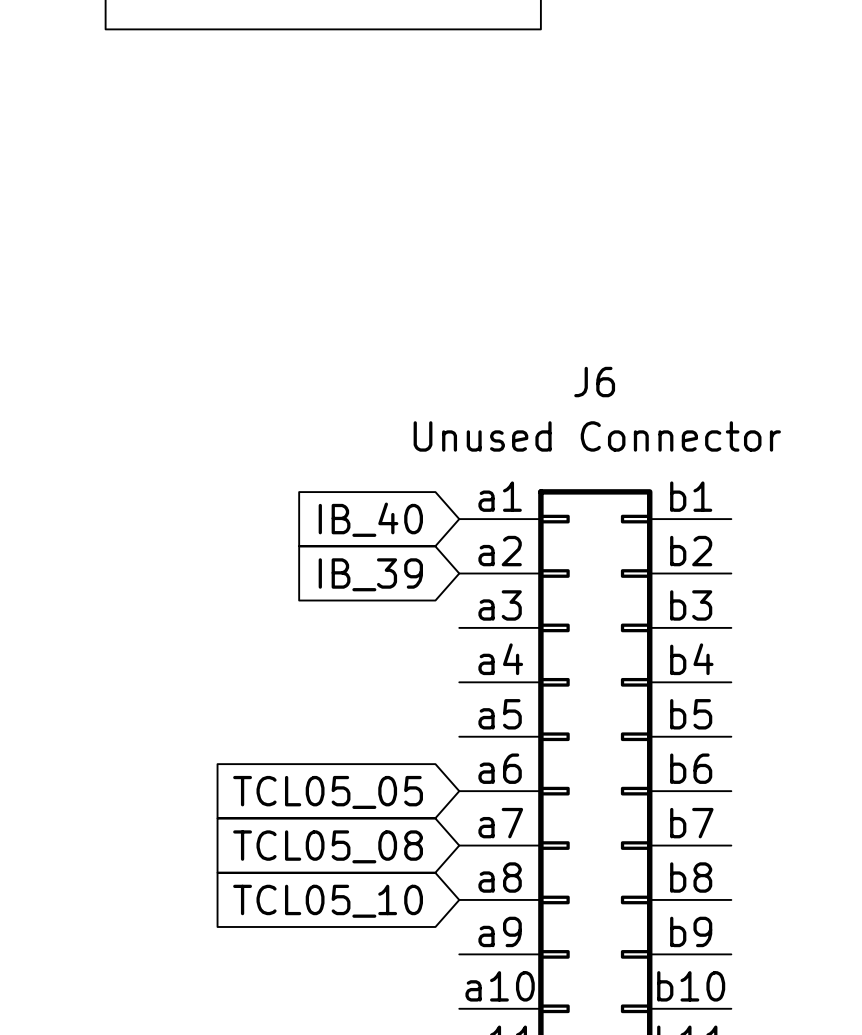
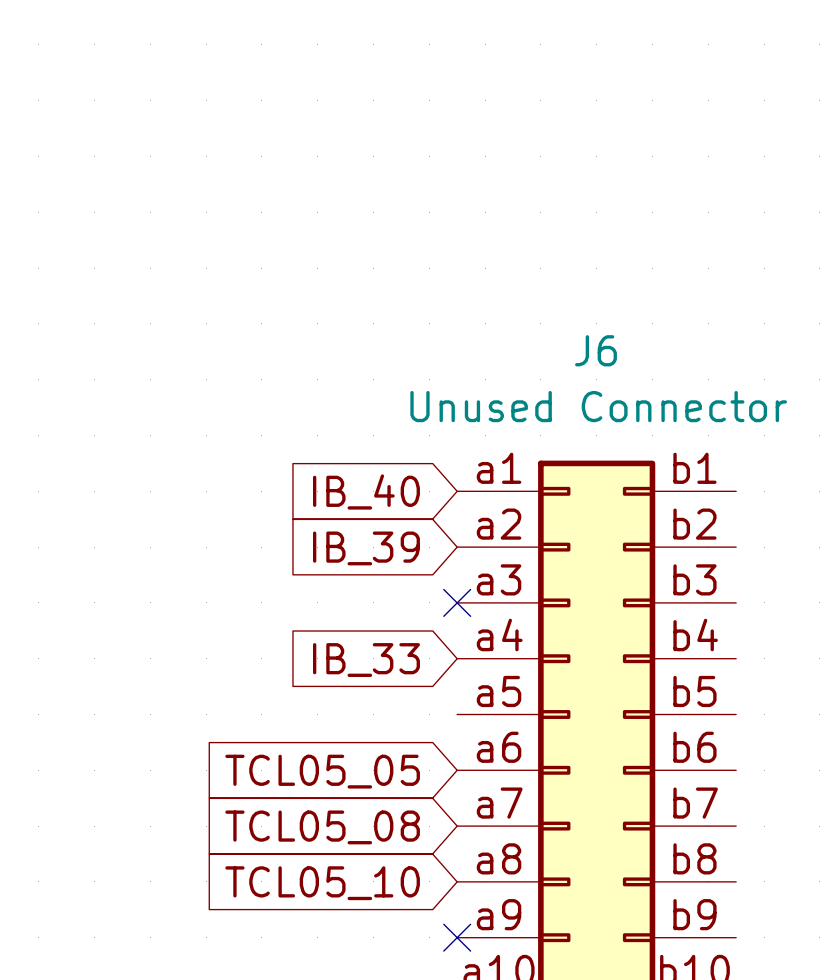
no-connect mark: none -> (457, 602)
global label: none -> IB_33 (366, 660)
no-connect mark: none -> (457, 937)

